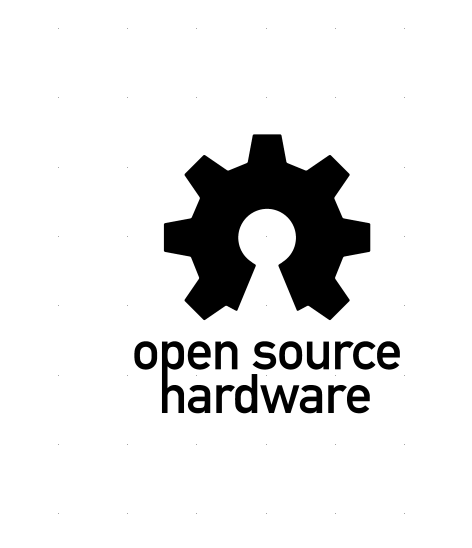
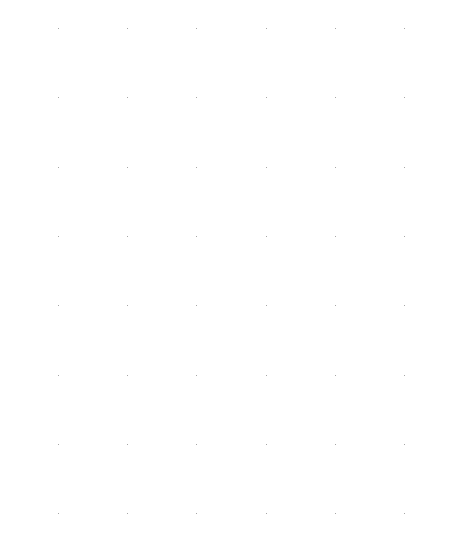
part: (267, 273) -> none

